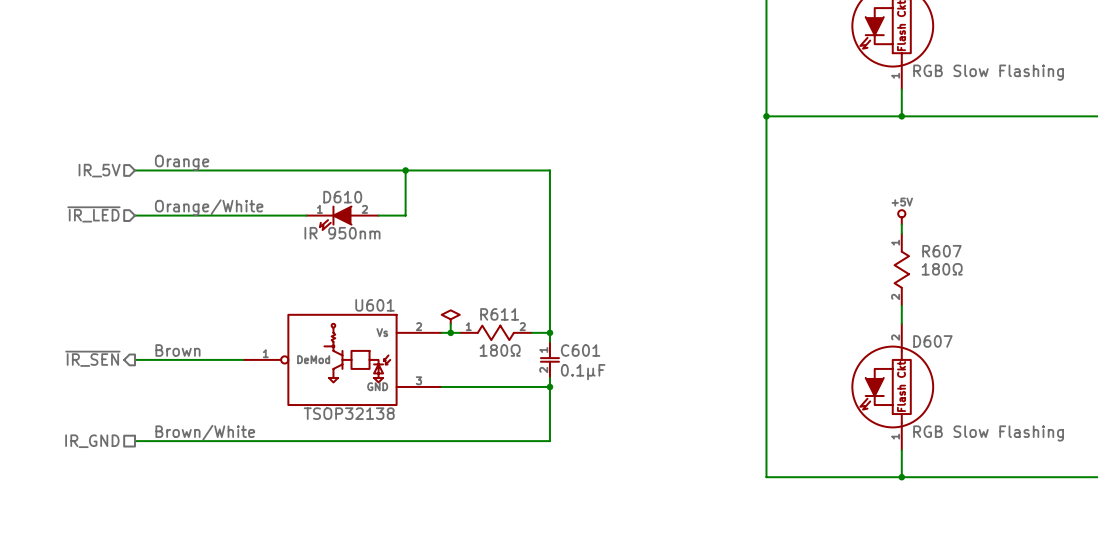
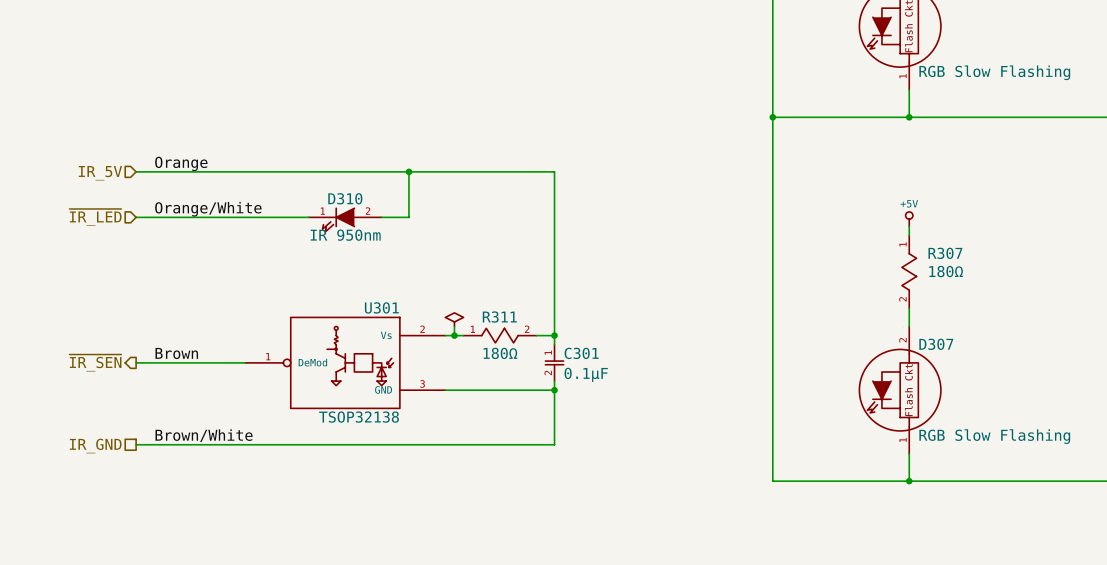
D610 name: D610 (342, 197) -> D310 (345, 198)
R607 name: R607 (941, 251) -> R307 (945, 253)
U601 name: U601 (375, 305) -> U301 (381, 307)
R611 name: R611 (499, 314) -> R311 (499, 317)
D607 name: D607 (932, 341) -> D307 (936, 344)
C601 name: C601 (580, 350) -> C301 (581, 353)

